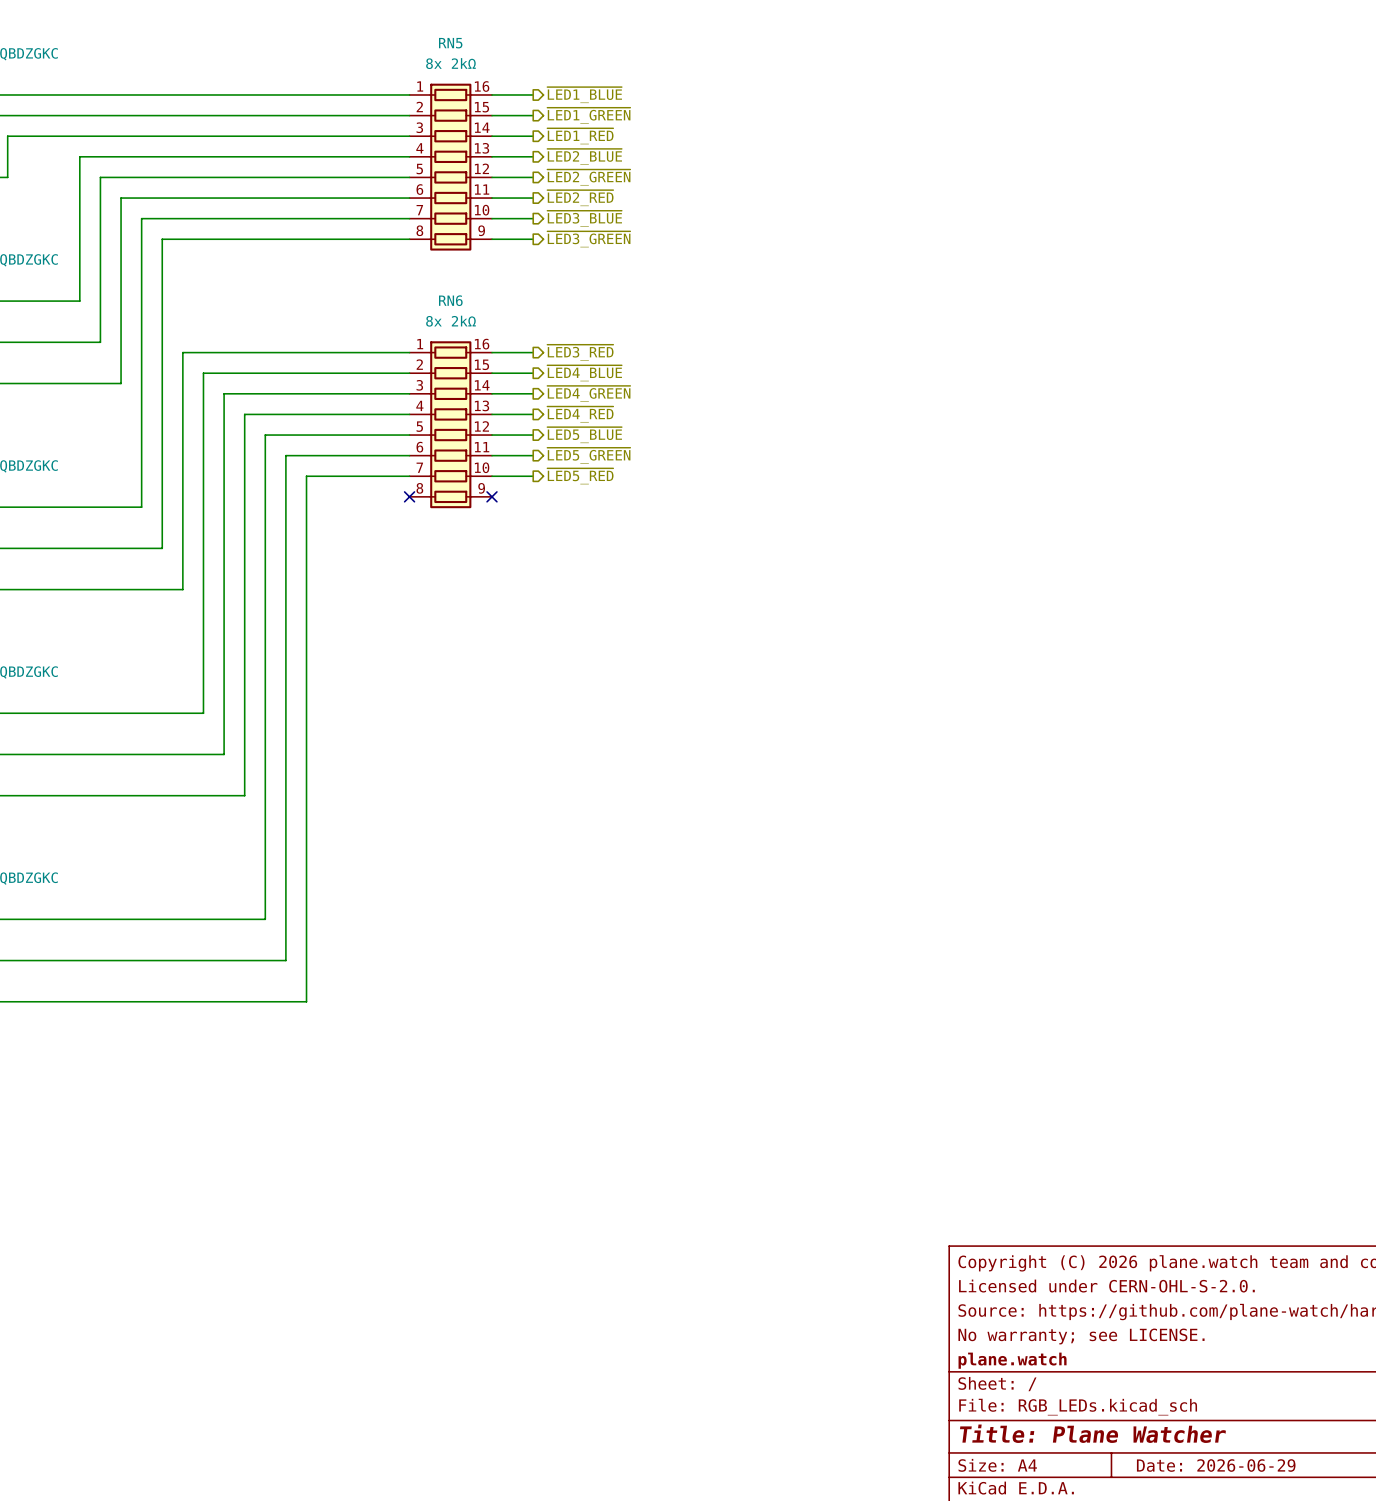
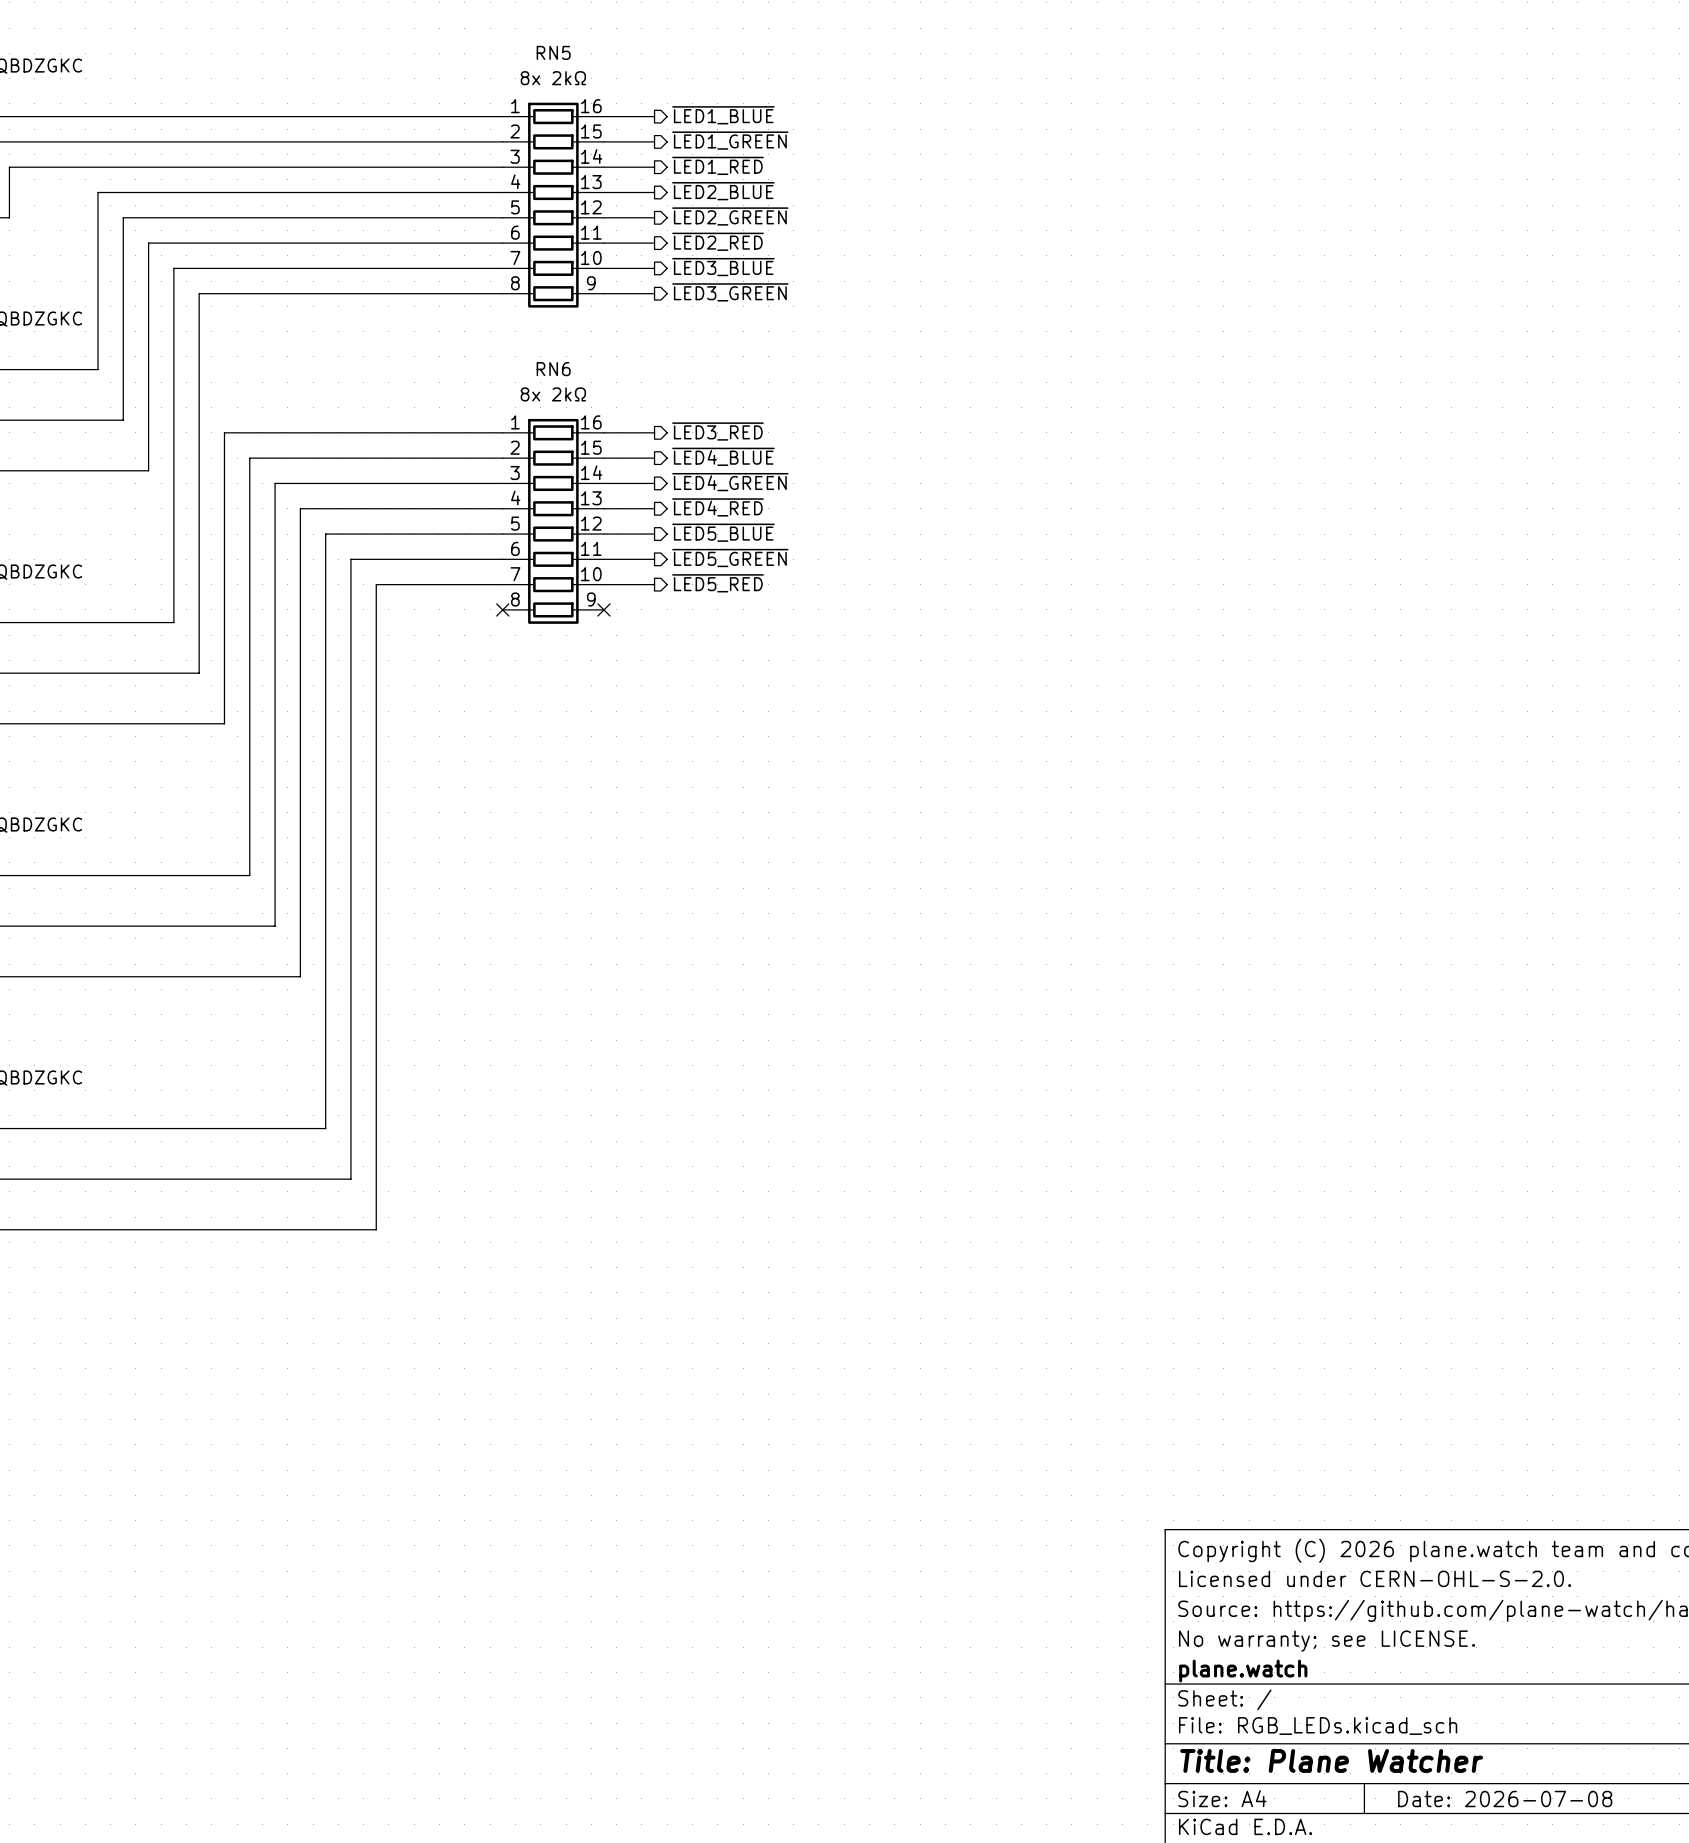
title block: Date: 2026-06-29 (1216, 1465) -> Date: 2026-07-08 (1505, 1799)

